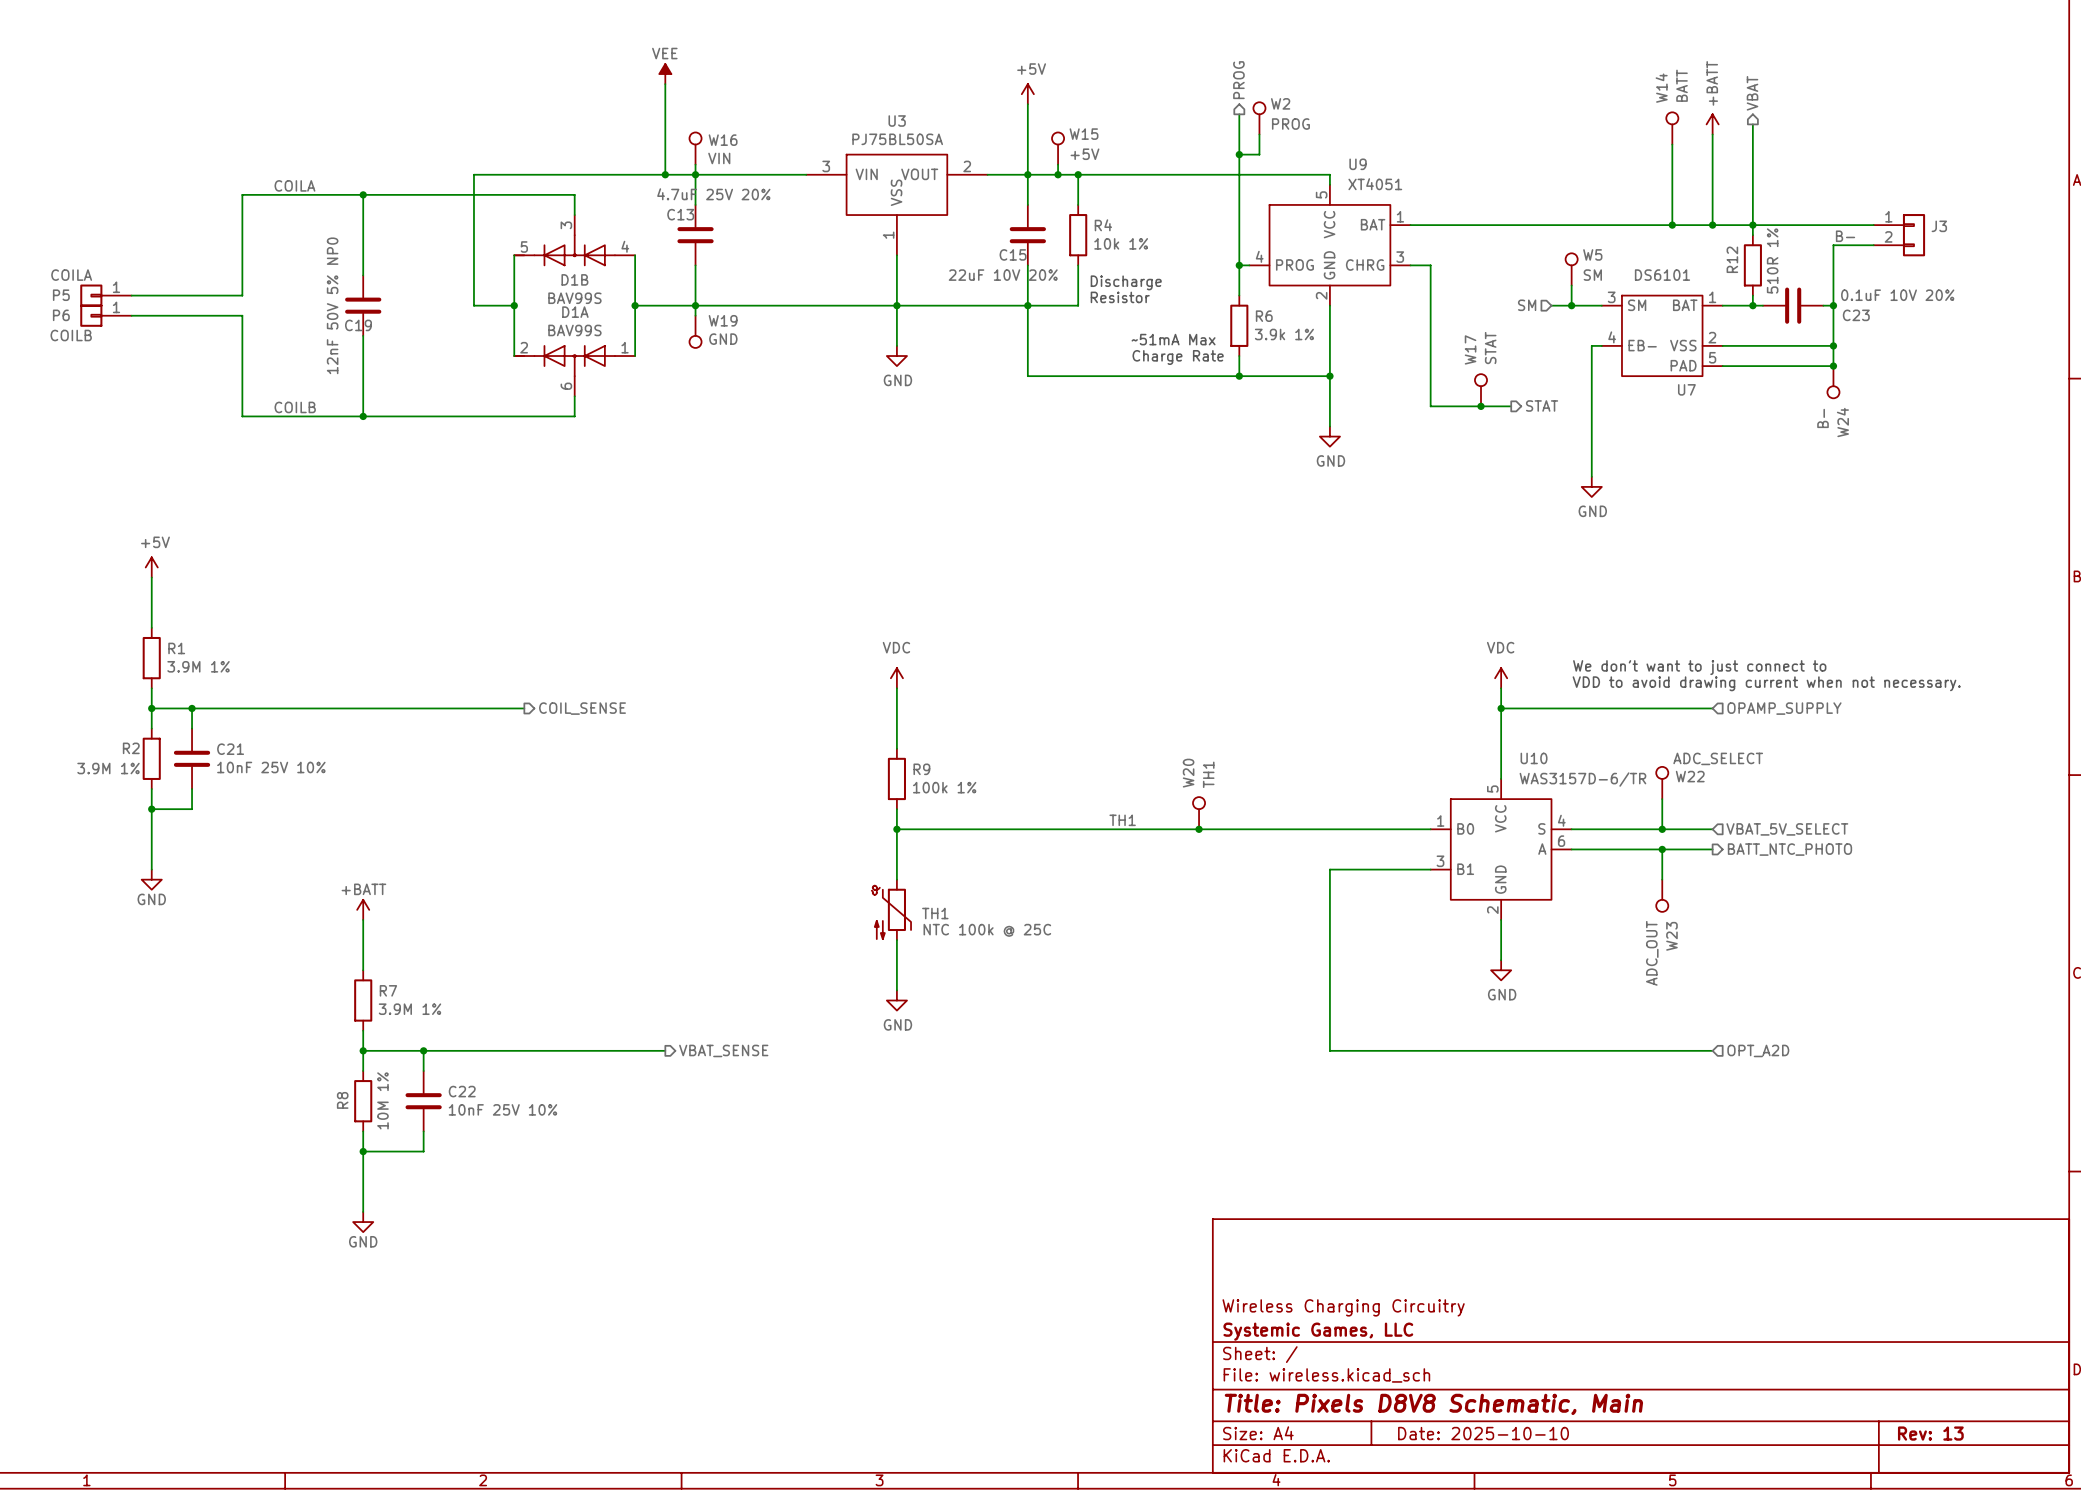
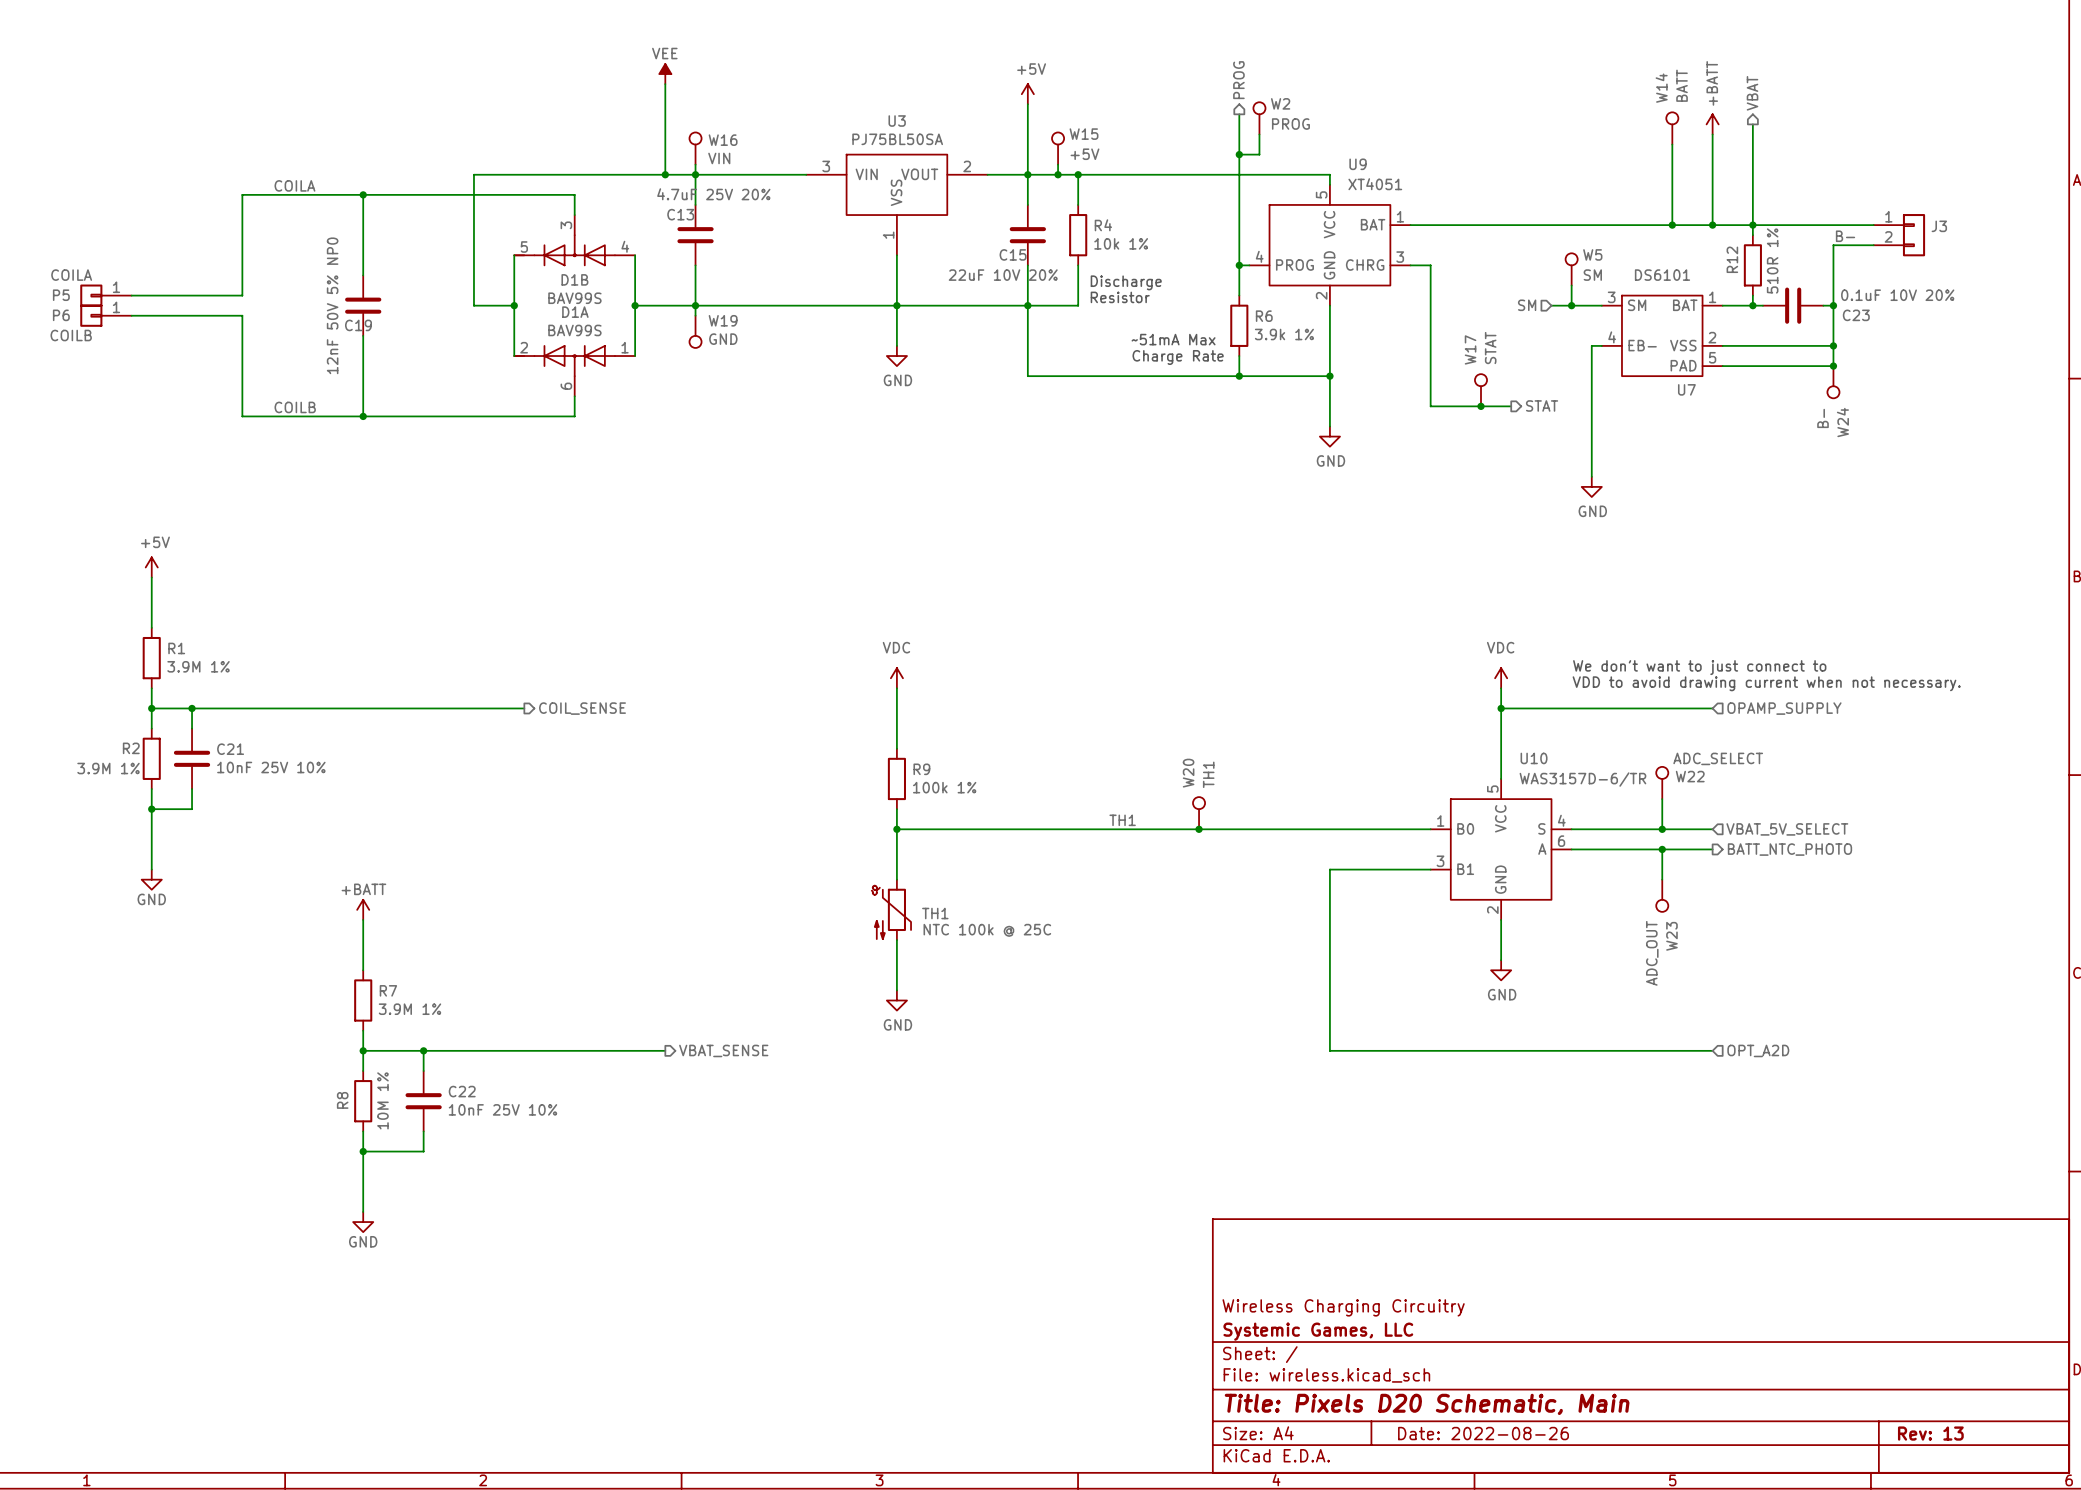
title block: Title: Pixels D8V8 Schematic, Main (1433, 1404) -> Title: Pixels D20 Schematic, Main (1427, 1404)
title block: Date: 2025-10-10 (1483, 1433) -> Date: 2022-08-26 (1483, 1433)

